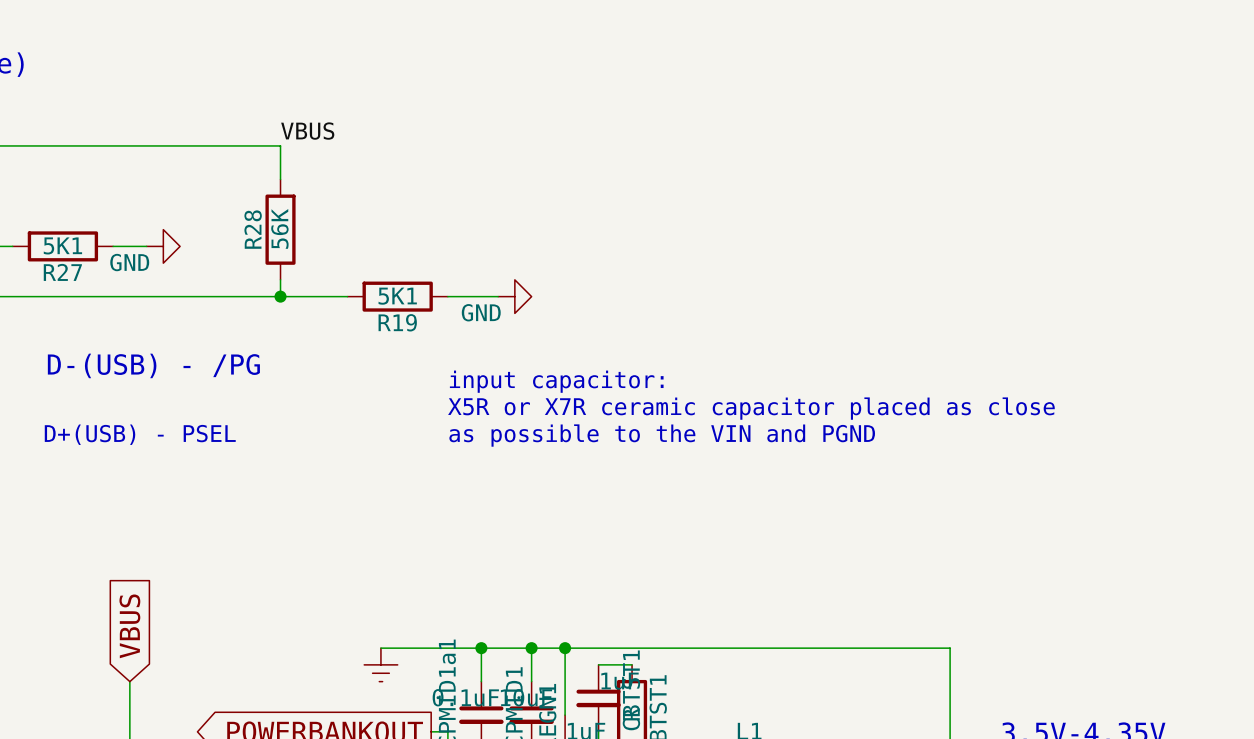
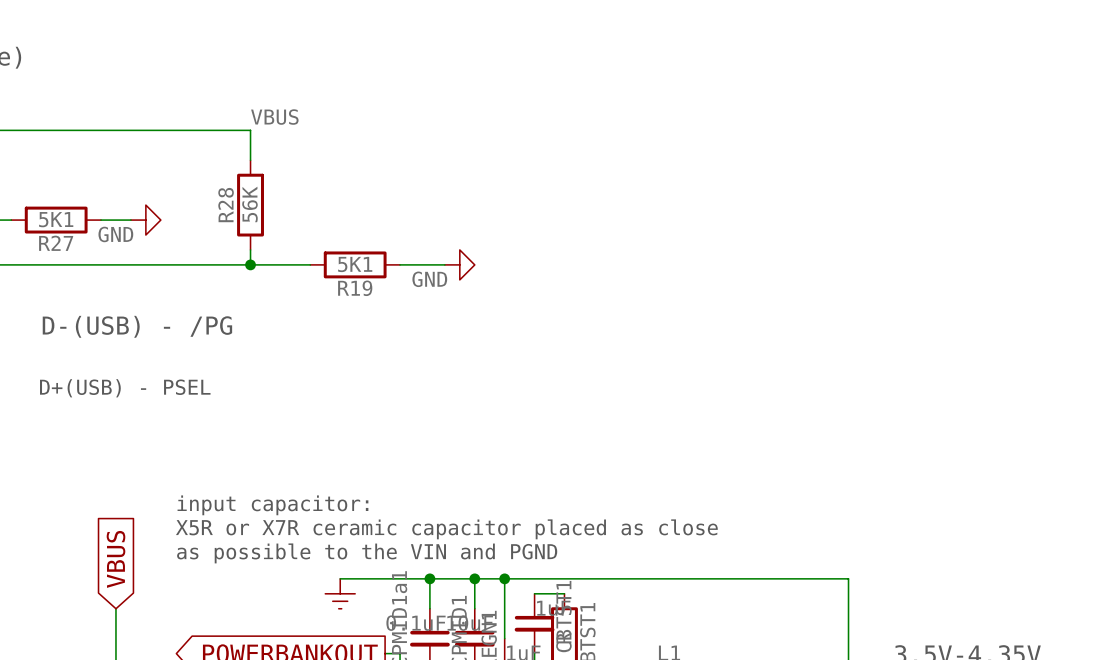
text position: input capacitor: (556, 381) -> input capacitor: (272, 505)
text position: X5R or X7R ceramic capacitor placed as close (751, 408) -> X5R or X7R ceramic capacitor placed as close (446, 529)
text position: as possible to the VIN and PGND (662, 435) -> as possible to the VIN and PGND (367, 553)

